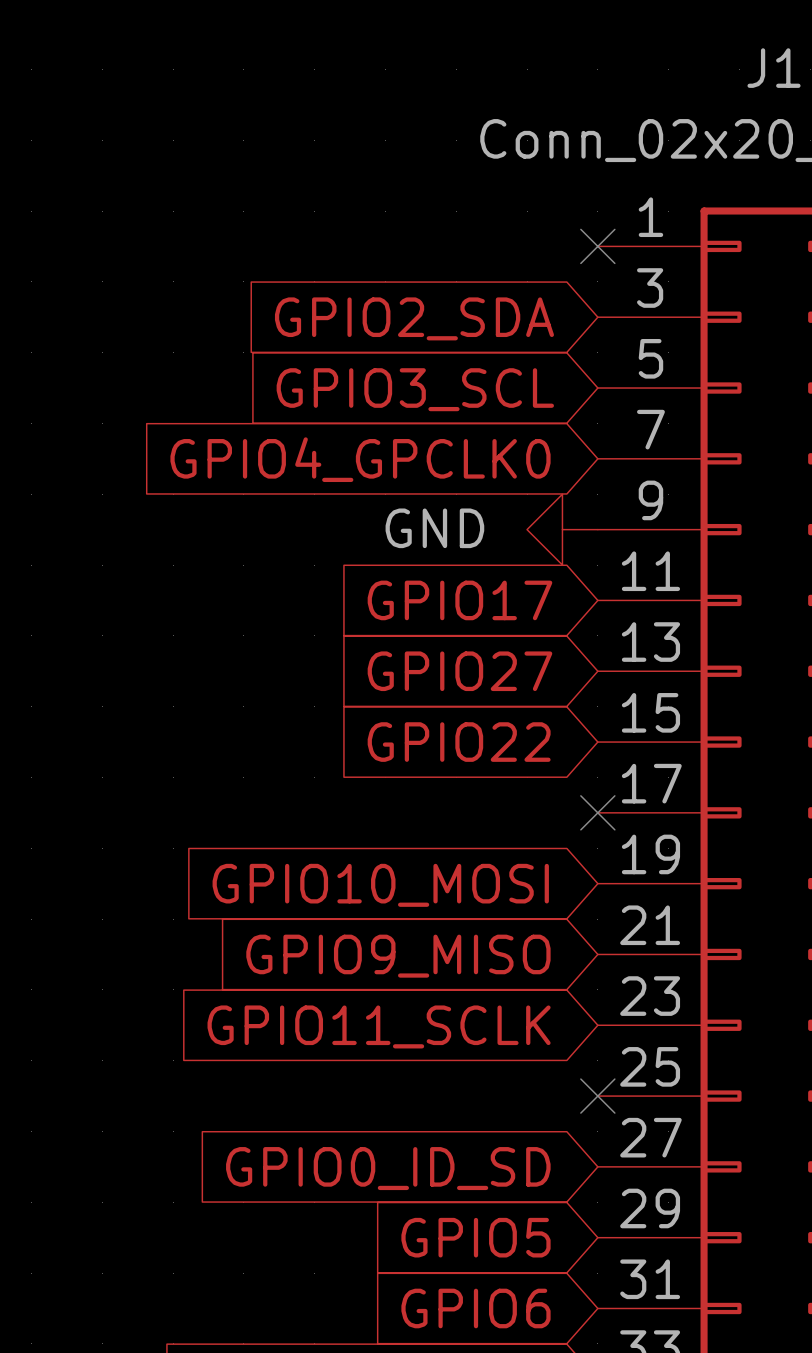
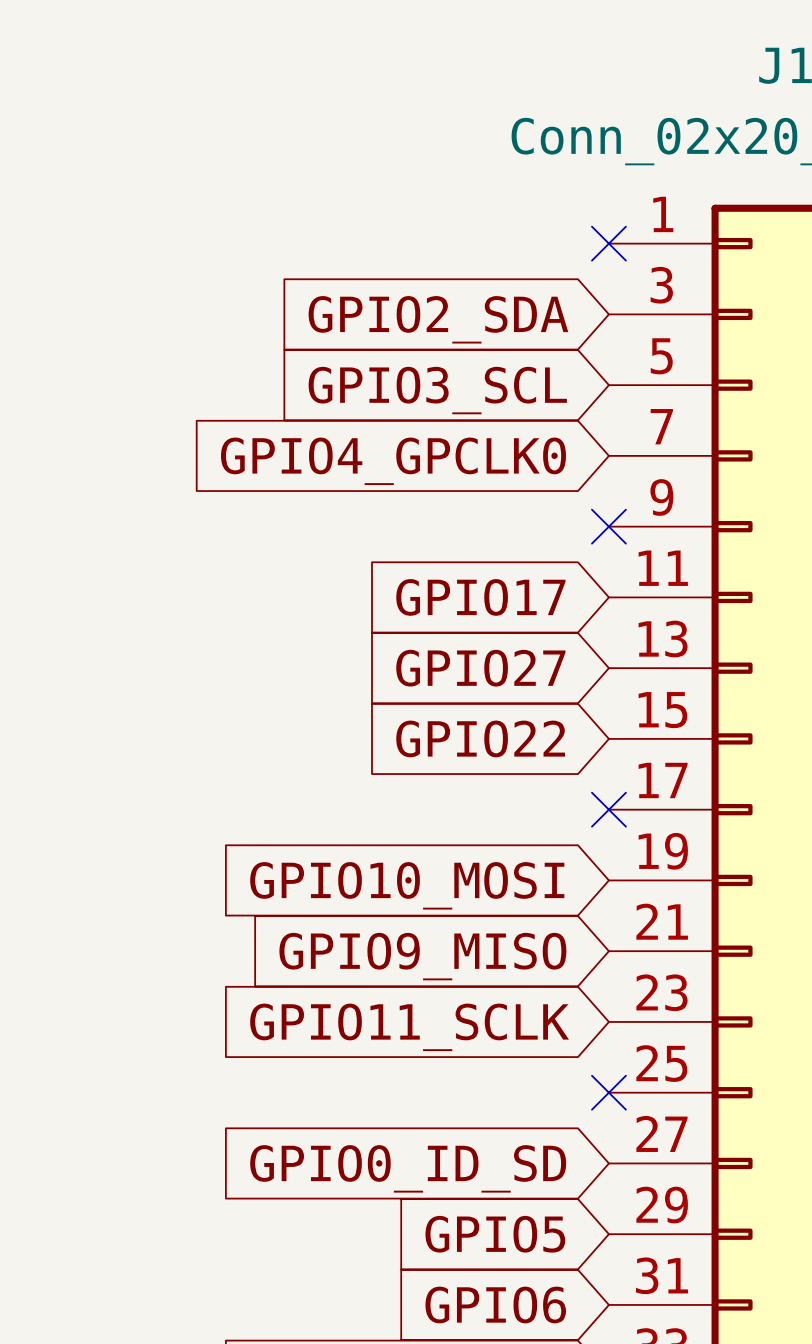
power symbol: GND (562, 529) -> none
no-connect mark: none -> (608, 526)

